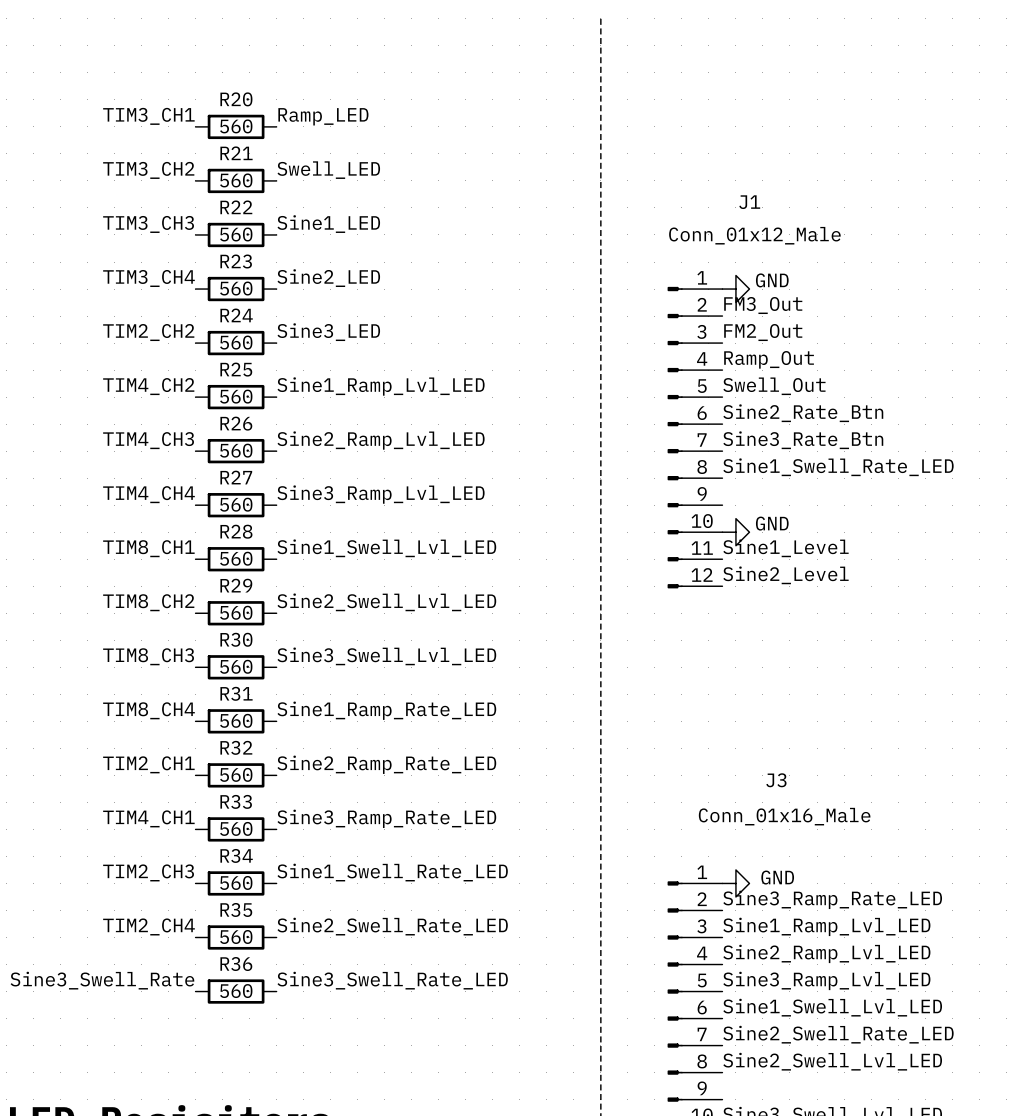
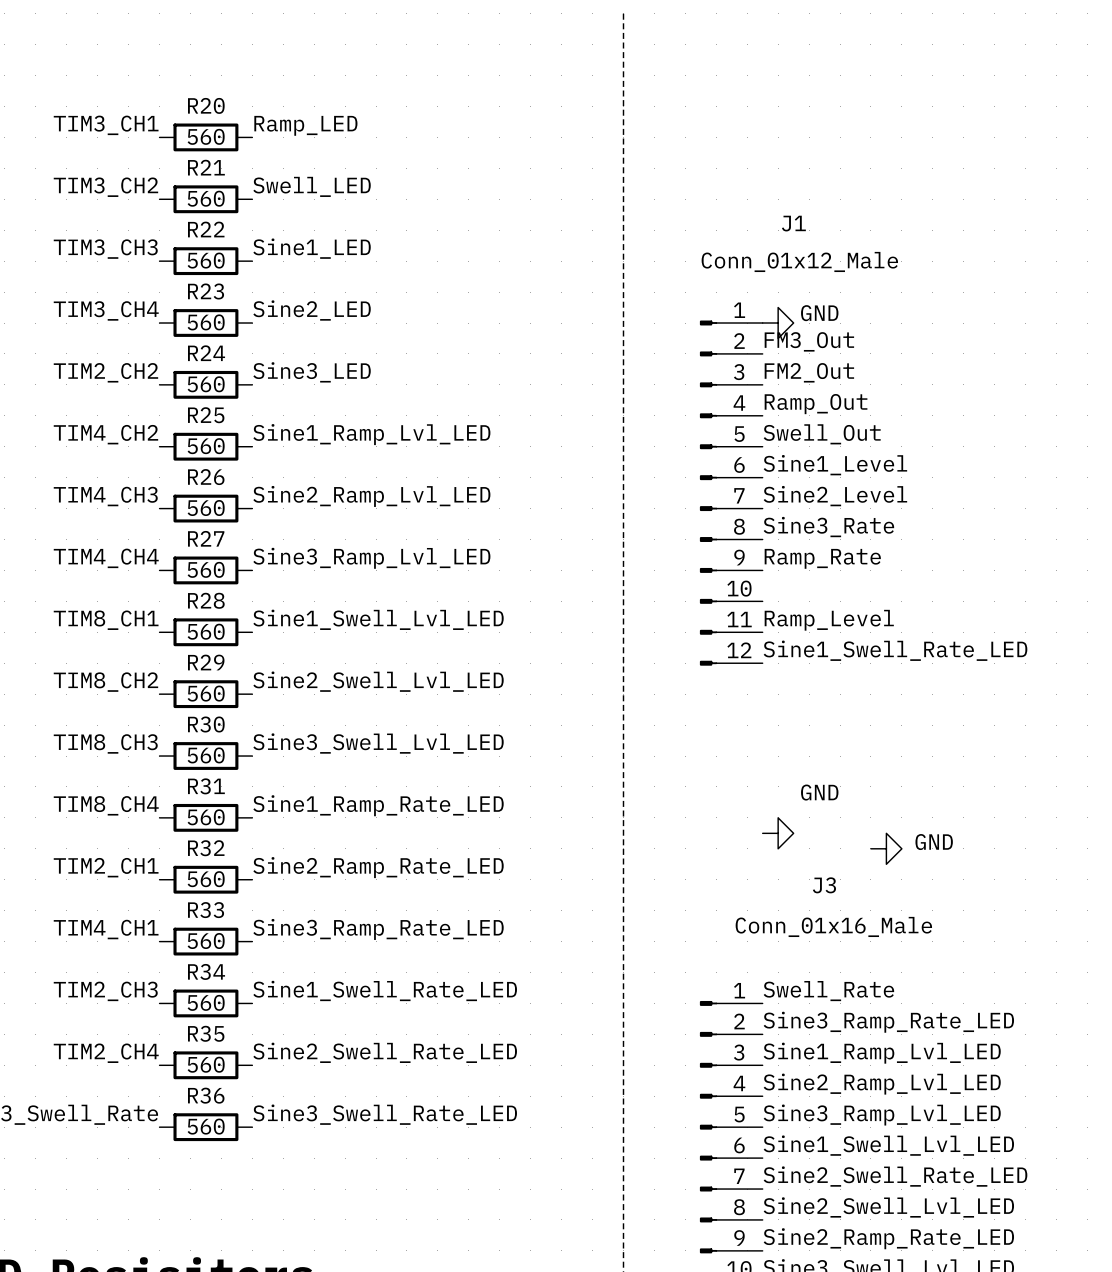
label: Sine2_Rate_Btn (803, 413) -> Sine1_Level (835, 465)
label: Sine3_Rate_Btn (803, 440) -> Sine2_Level (835, 496)
label: Sine1_Swell_Rate_LED (838, 467) -> Sine3_Rate (828, 527)
label: none -> Ramp_Rate (822, 558)
power symbol: GND (735, 532) -> none
label: Sine1_Level (785, 548) -> Ramp_Level (829, 620)
label: Sine2_Level (785, 575) -> Sine1_Swell_Rate_LED (895, 650)
power symbol: none -> GND (778, 833)
power symbol: none -> GND (886, 848)
label: none -> Swell_Rate (828, 991)
power symbol: GND (735, 883) -> none
label: none -> Sine2_Ramp_Rate_LED (888, 1238)

